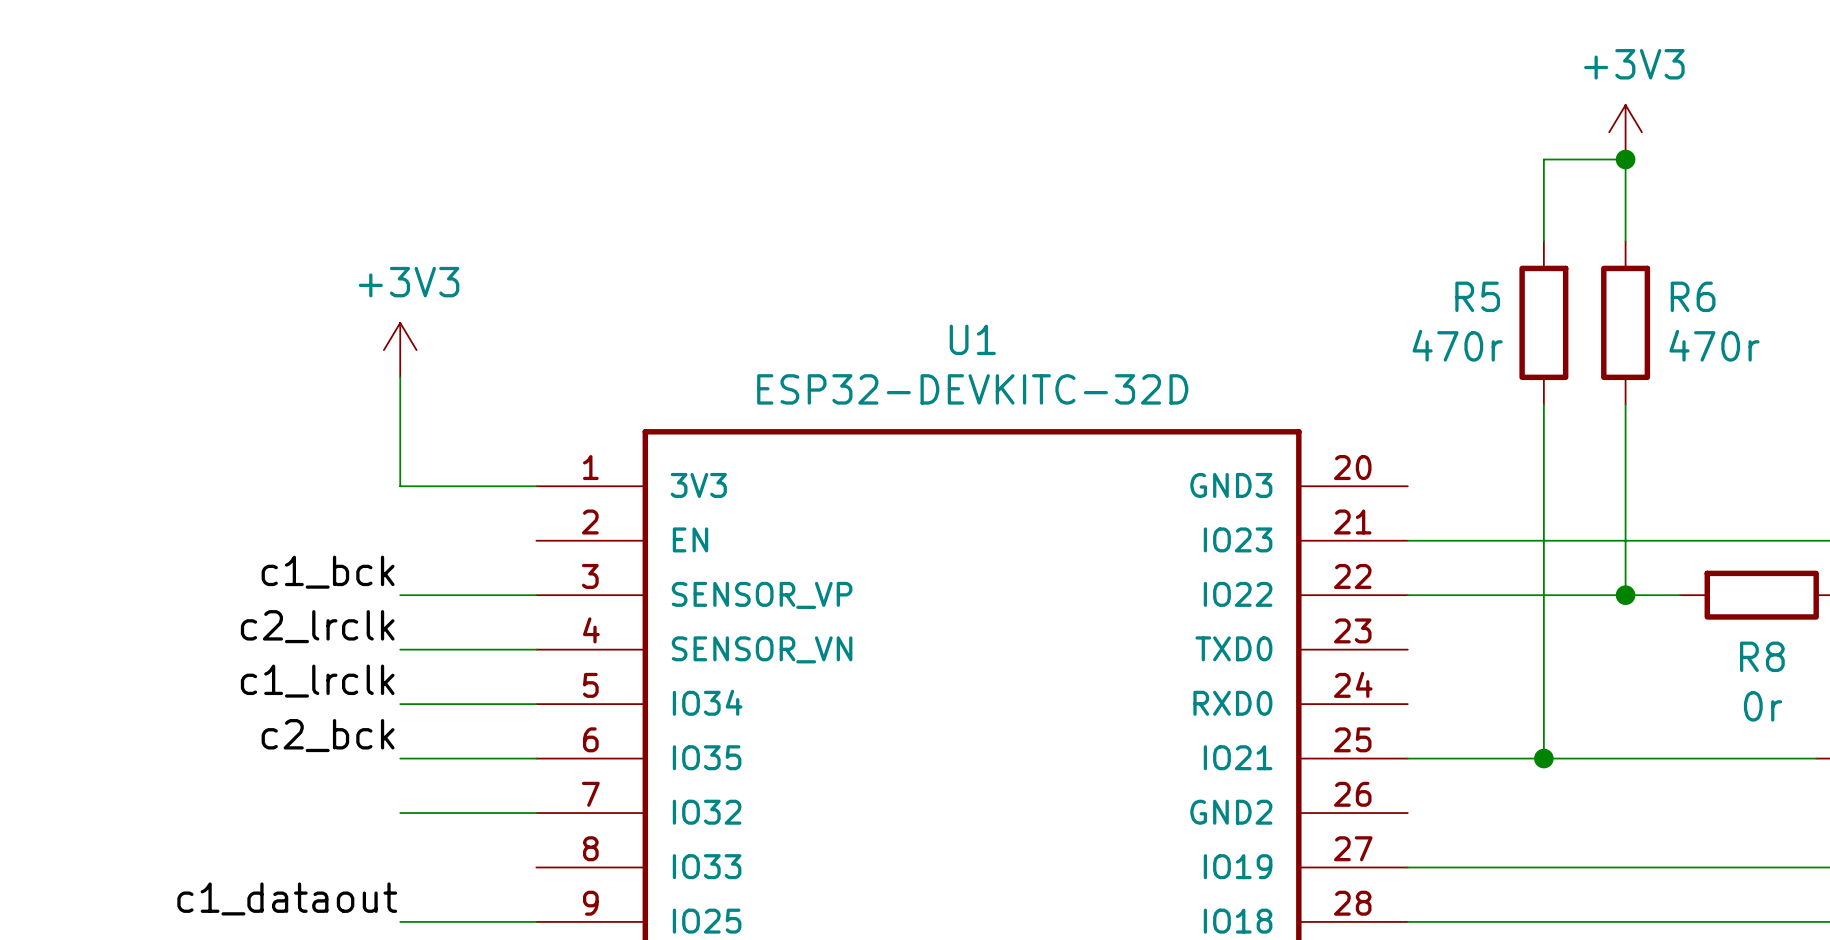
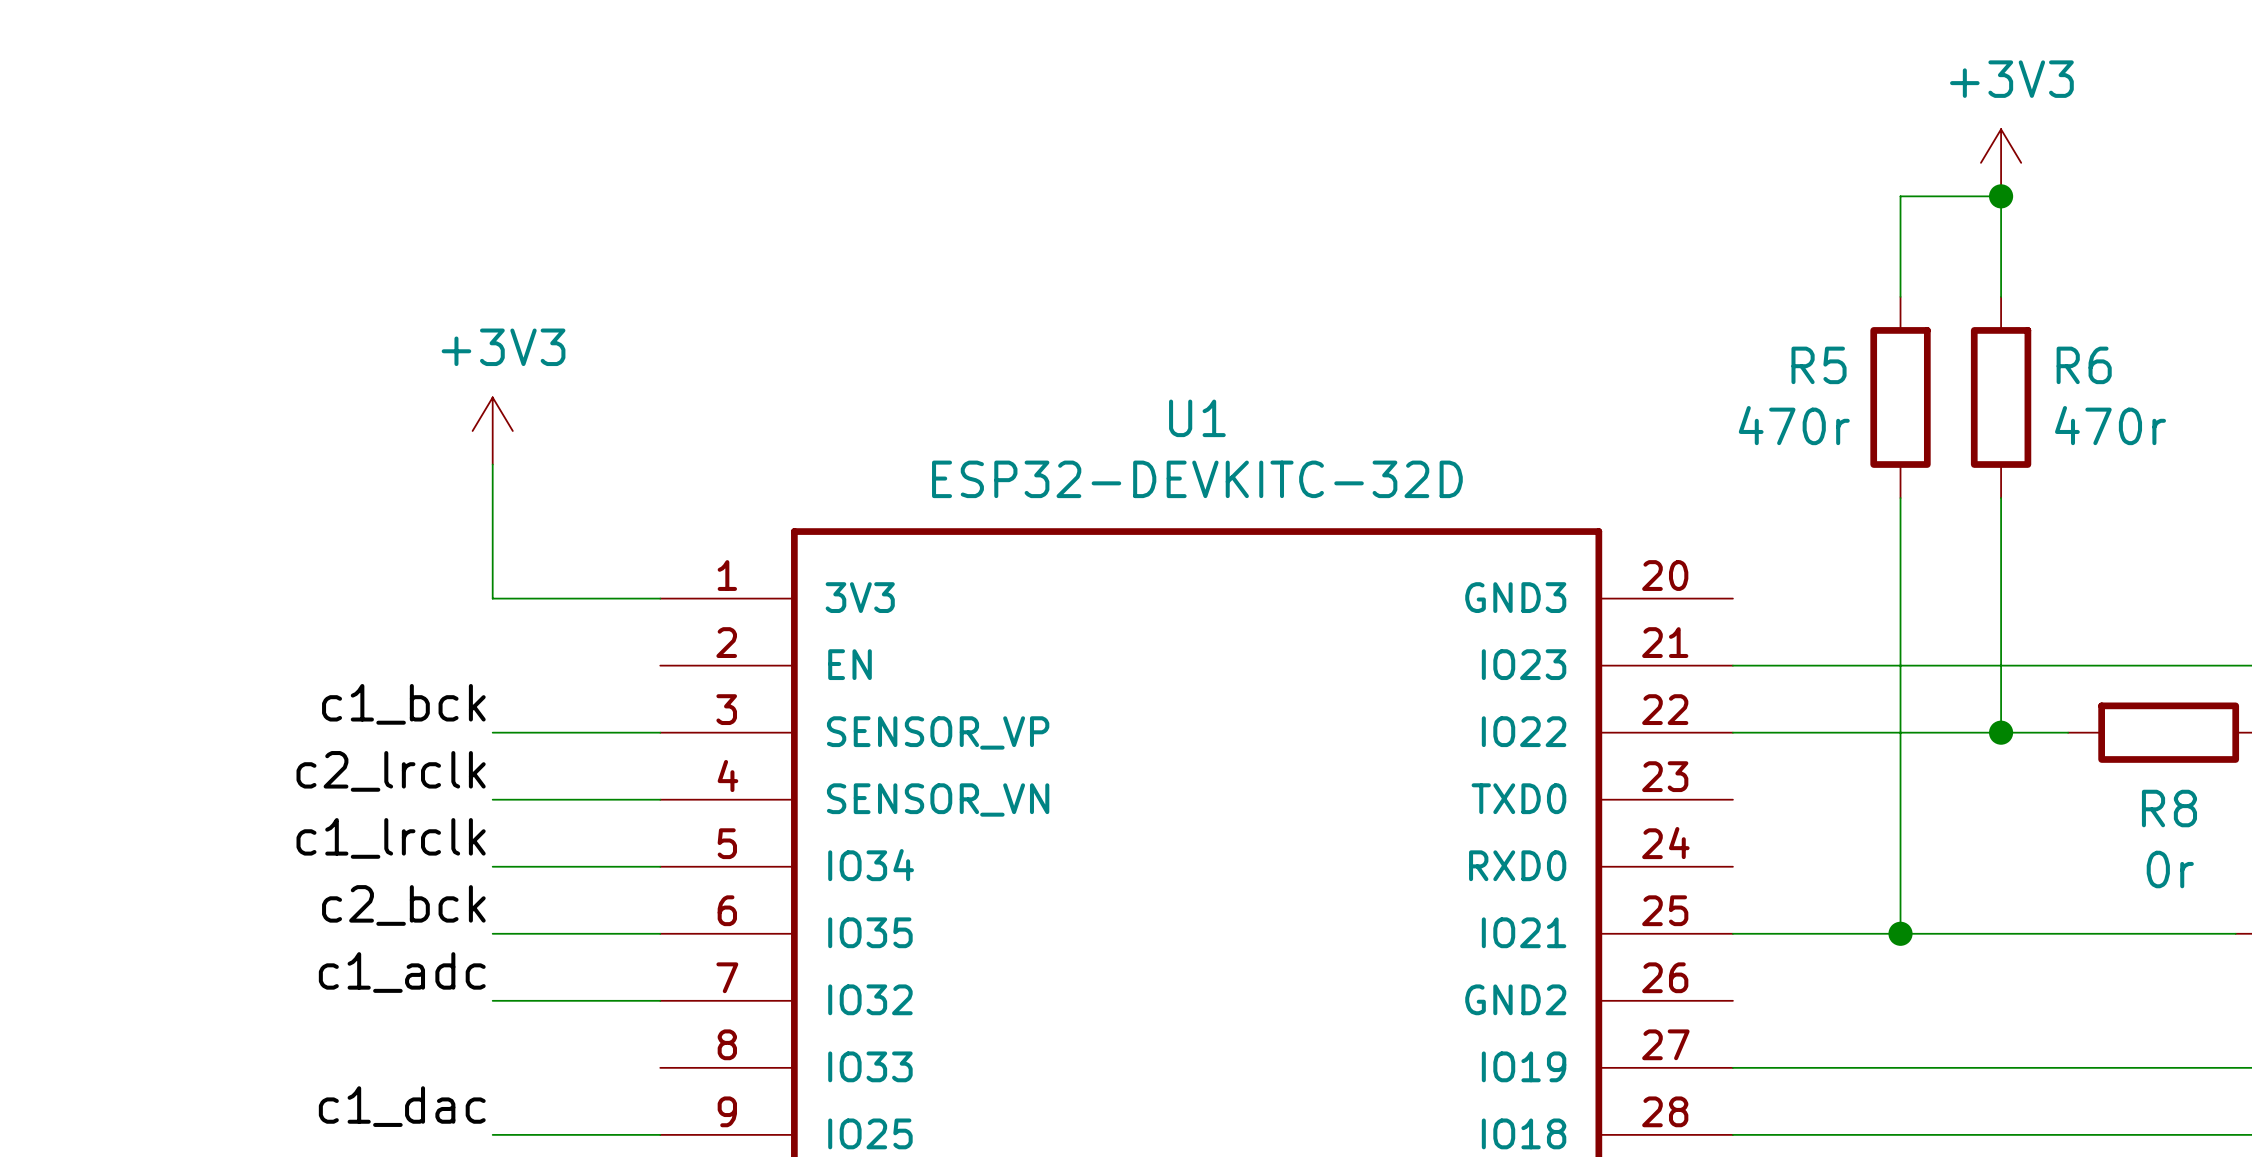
label: none -> c1_adc (402, 972)
label: c1_dataout (287, 898) -> c1_dac (402, 1106)

